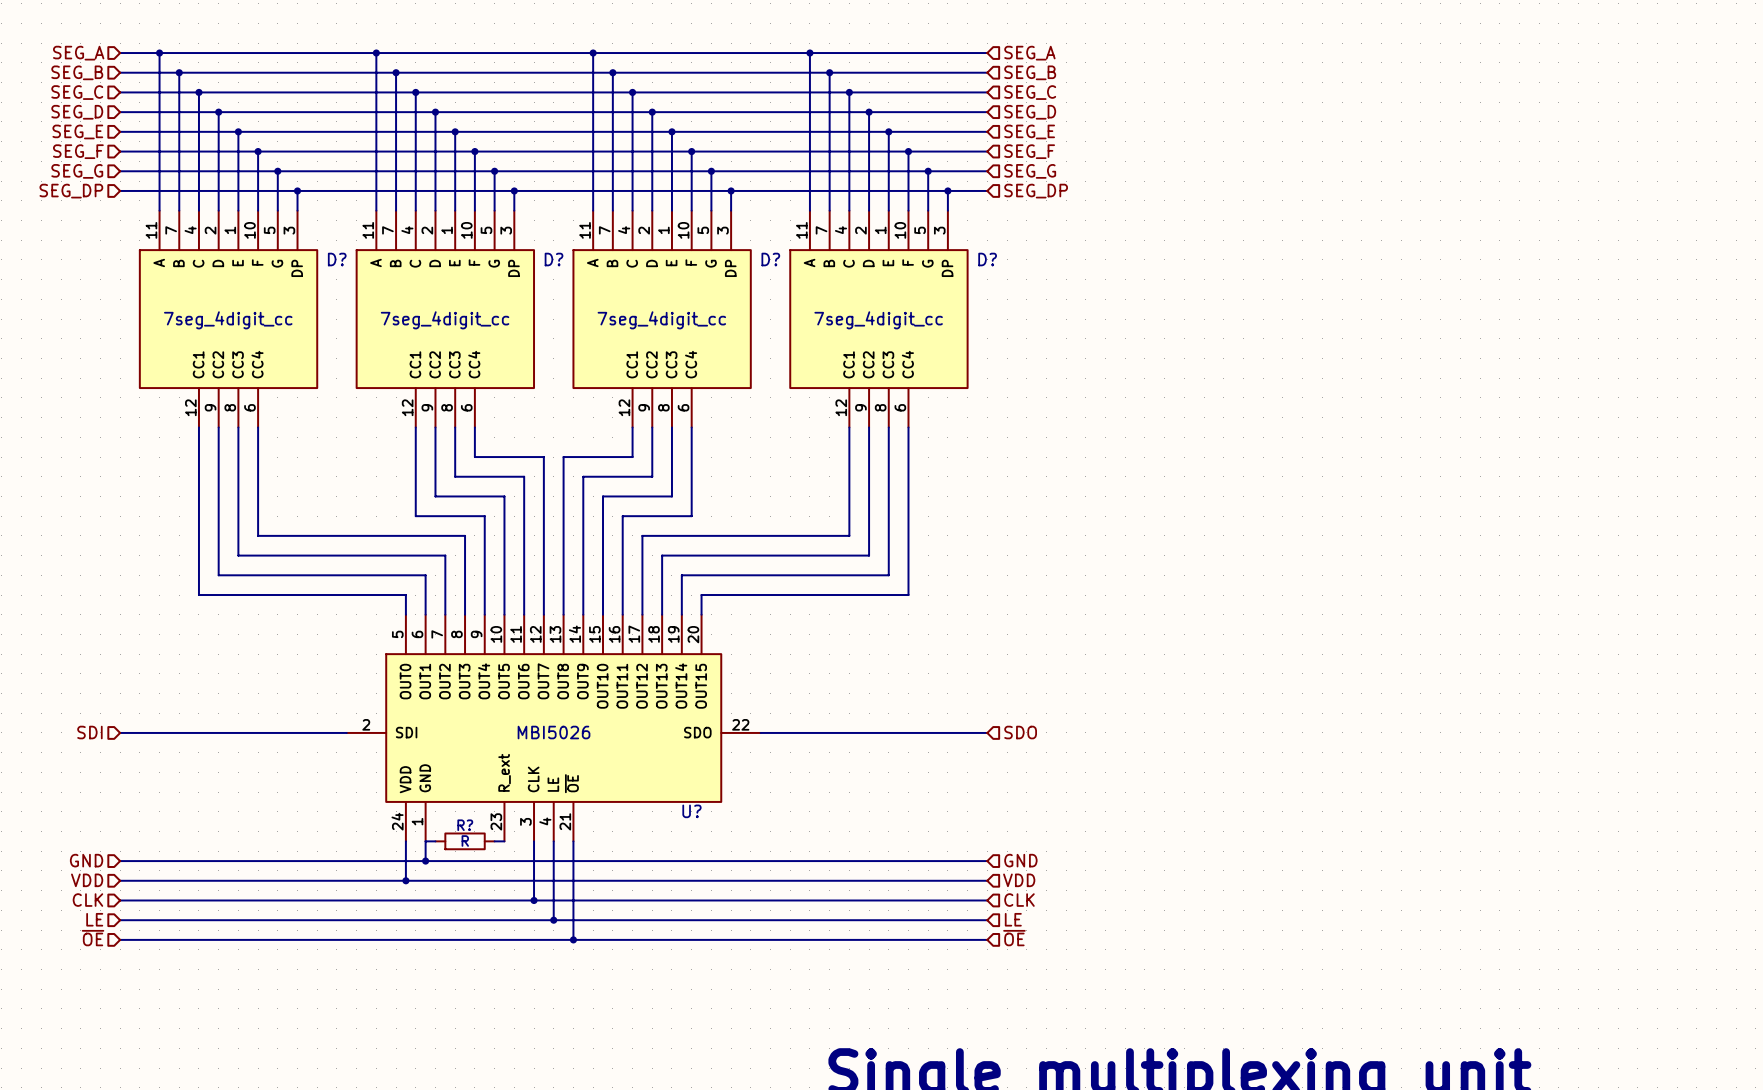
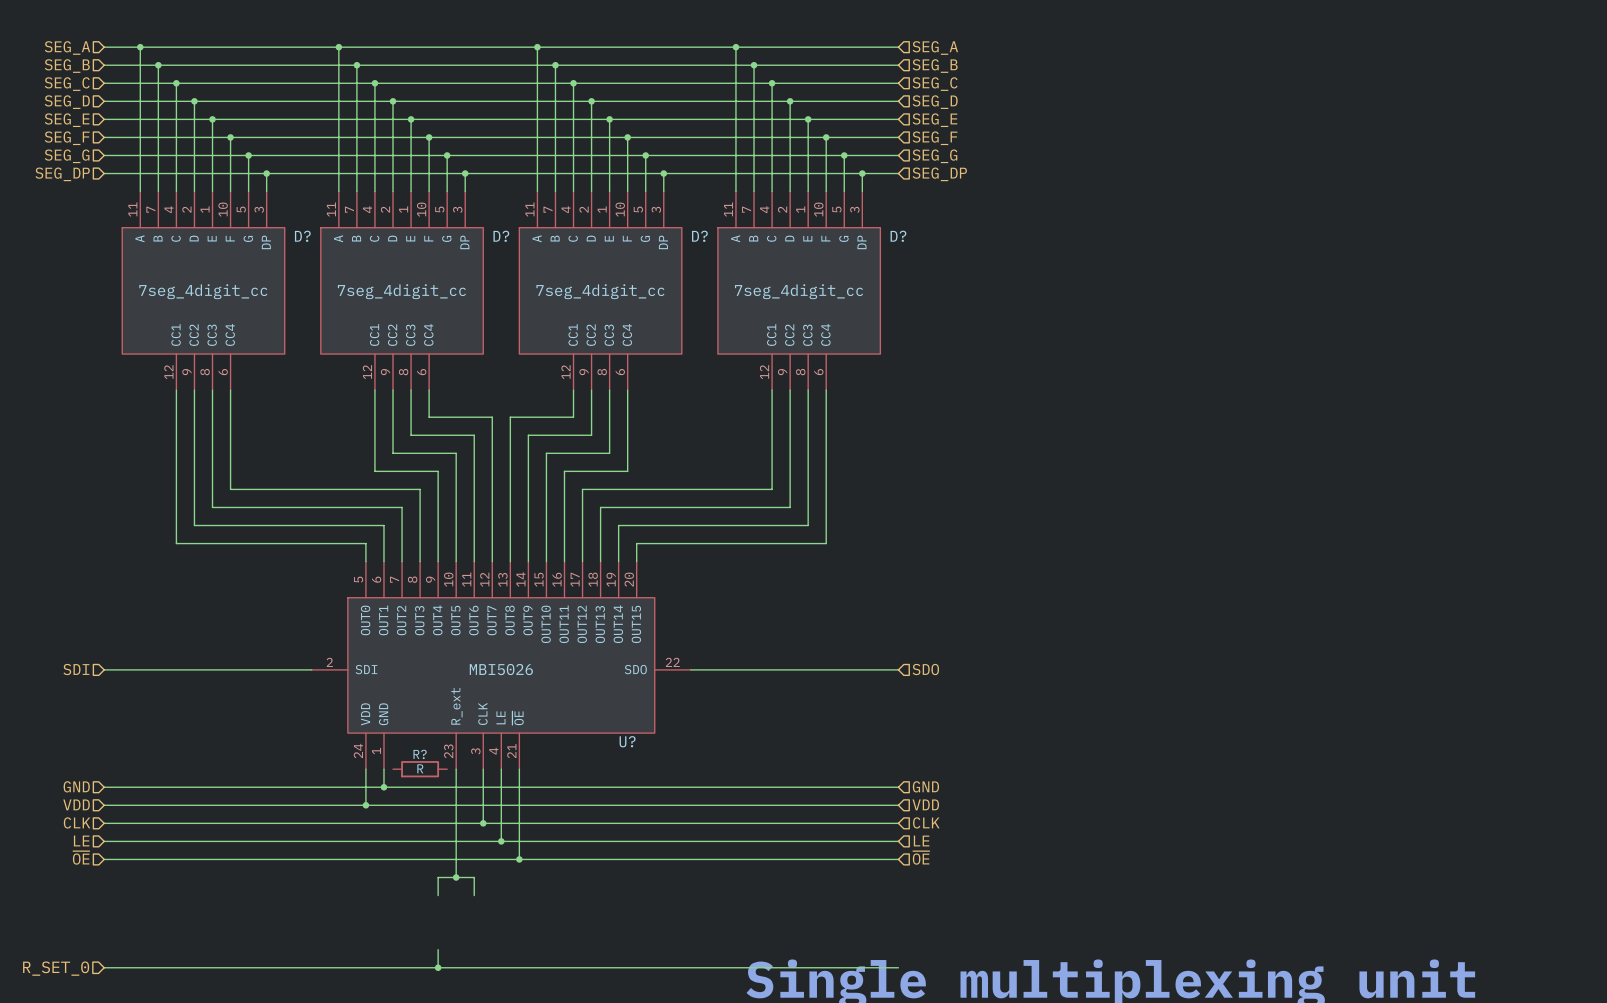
wire: (425, 841) (435, 841) -> none
wire: (494, 841) (504, 841) -> (456, 877) (456, 769)
junction: none -> (456, 877)
wire: none -> (438, 895) (438, 877) (474, 877) (474, 895)
wire: none -> (438, 949) (438, 967)
hierarchical label: none -> R_SET_0 (56, 968)
wire: none -> (104, 967) (898, 967)
junction: none -> (438, 967)

